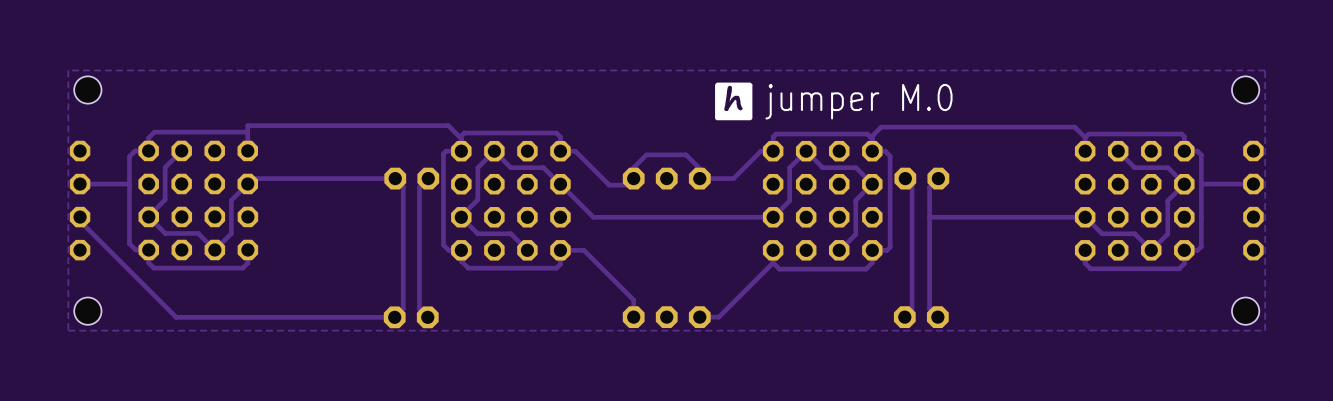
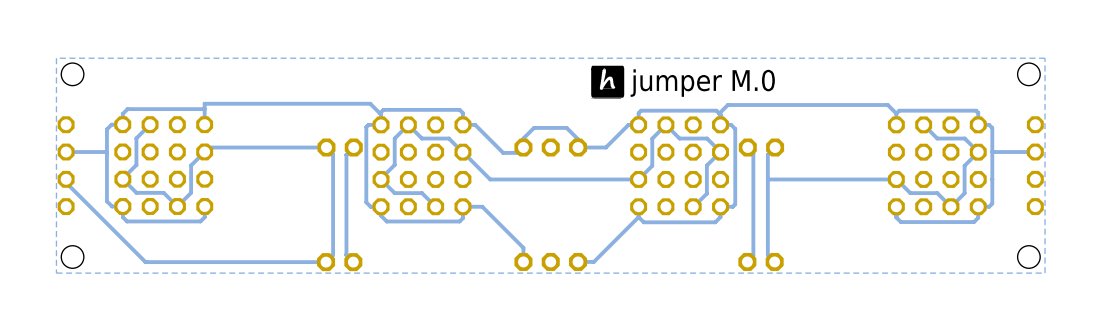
drawing: none -> [591, 65, 625, 99]
drawing: [715, 82, 753, 121] -> none

